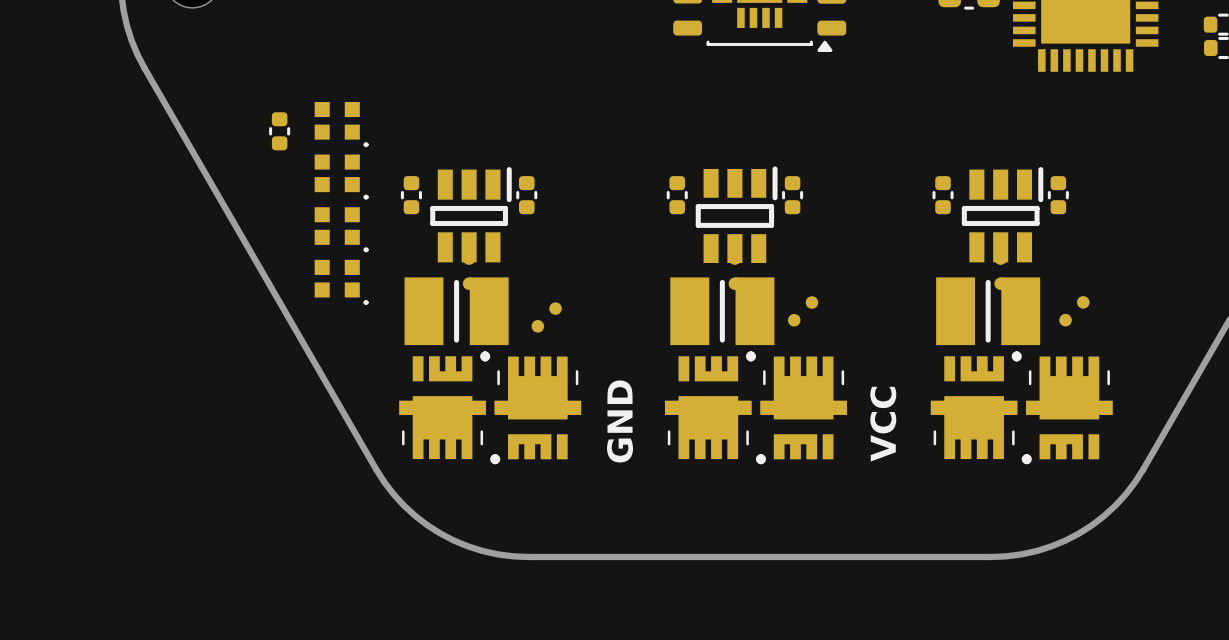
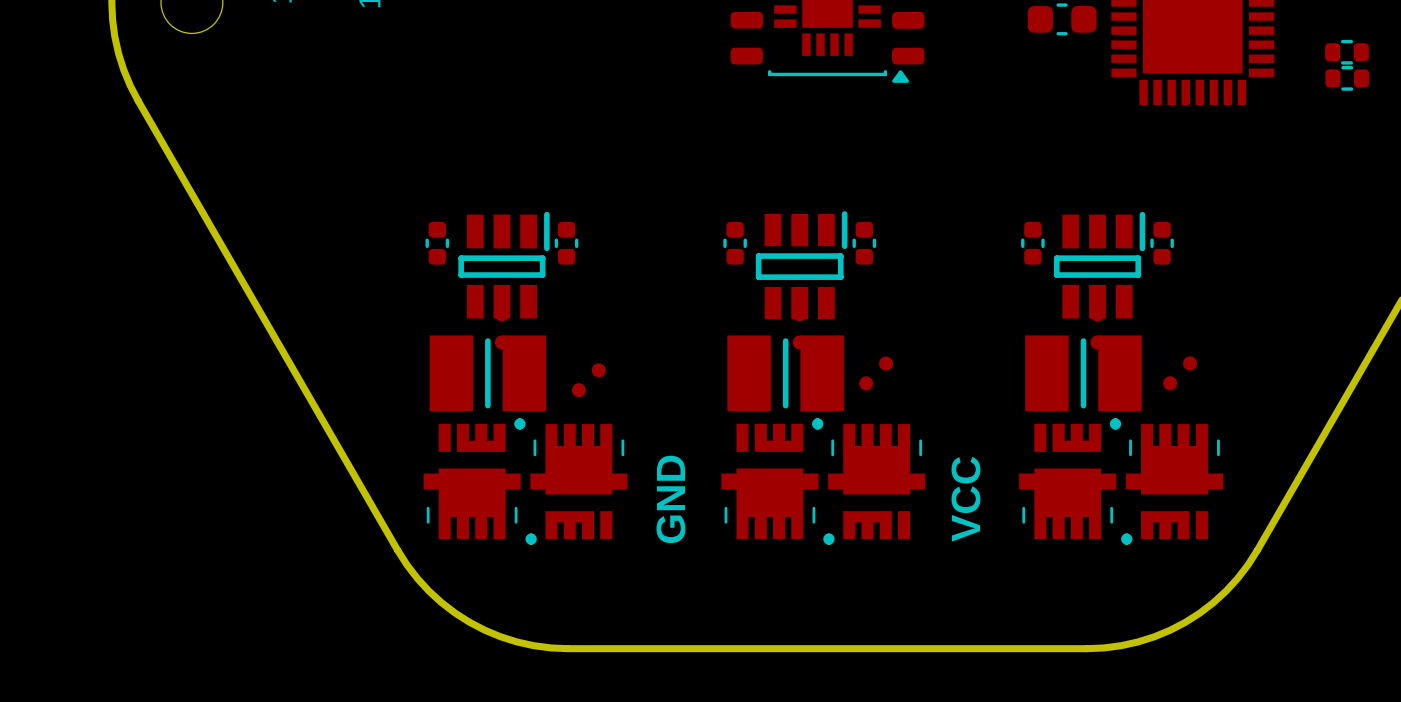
part: (341, 124) -> none
part: (279, 131) -> none
part: (341, 177) -> none
part: (341, 229) -> none
part: (341, 282) -> none

